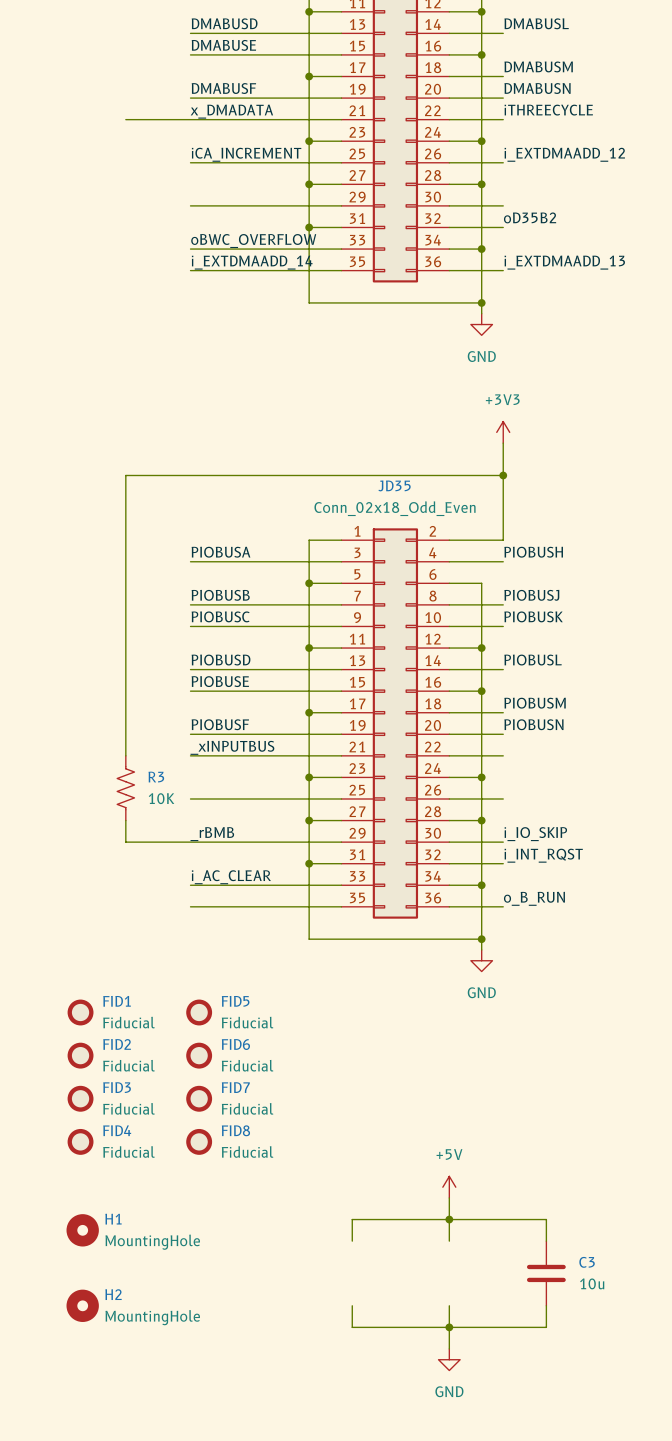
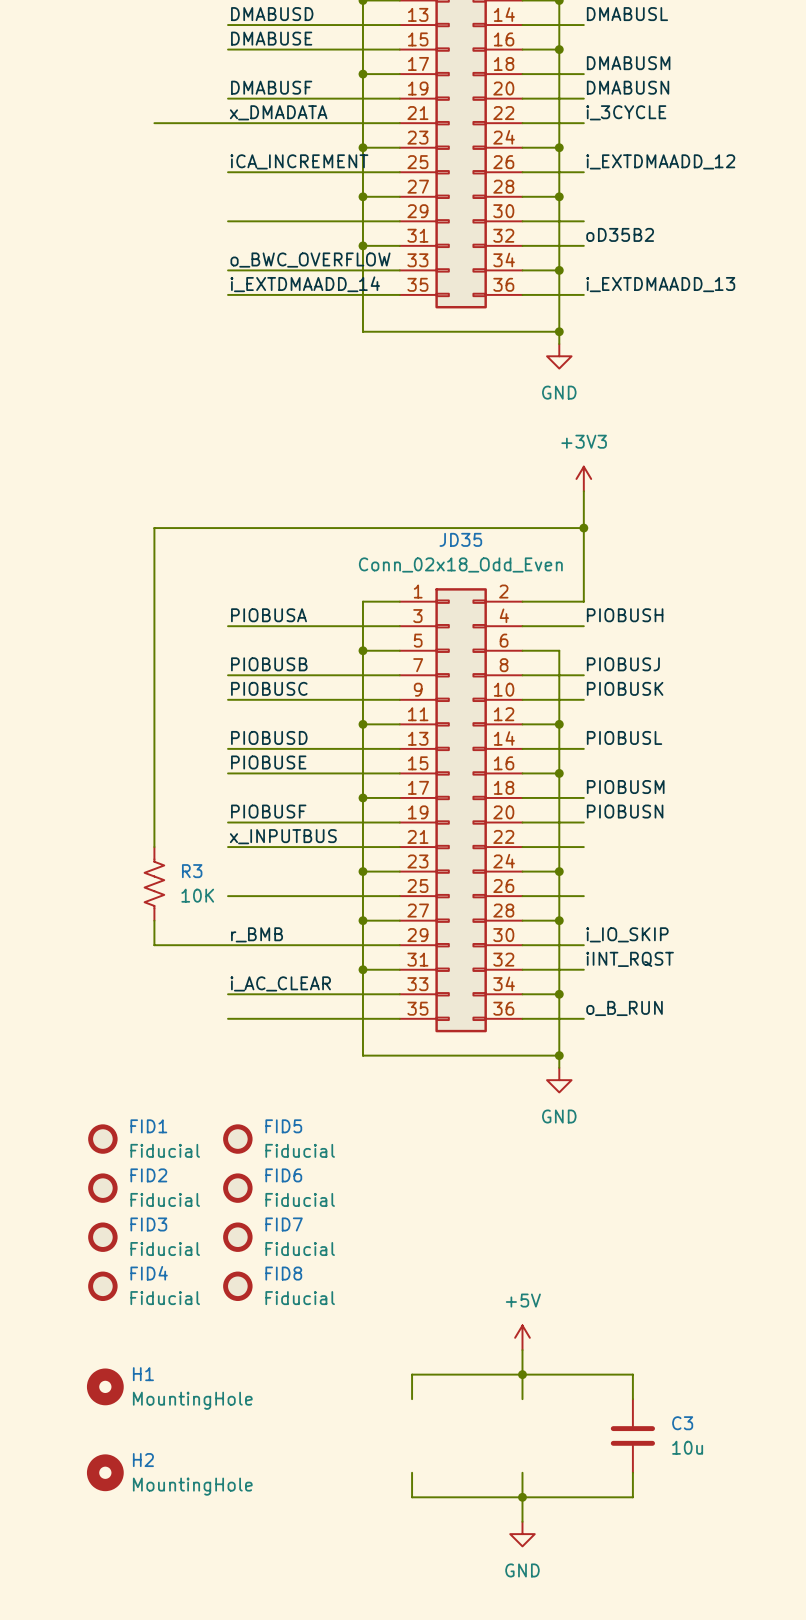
label: iTHREECYCLE (548, 110) -> i_3CYCLE (626, 112)
label: oBWC_OVERFLOW (253, 241) -> o_BWC_OVERFLOW (310, 260)
label: _xINPUTBUS (232, 747) -> x_INPUTBUS (283, 836)
label: _rBMB (212, 834) -> r_BMB (257, 934)
label: i_INT_RQST (543, 855) -> iINT_RQST (630, 959)

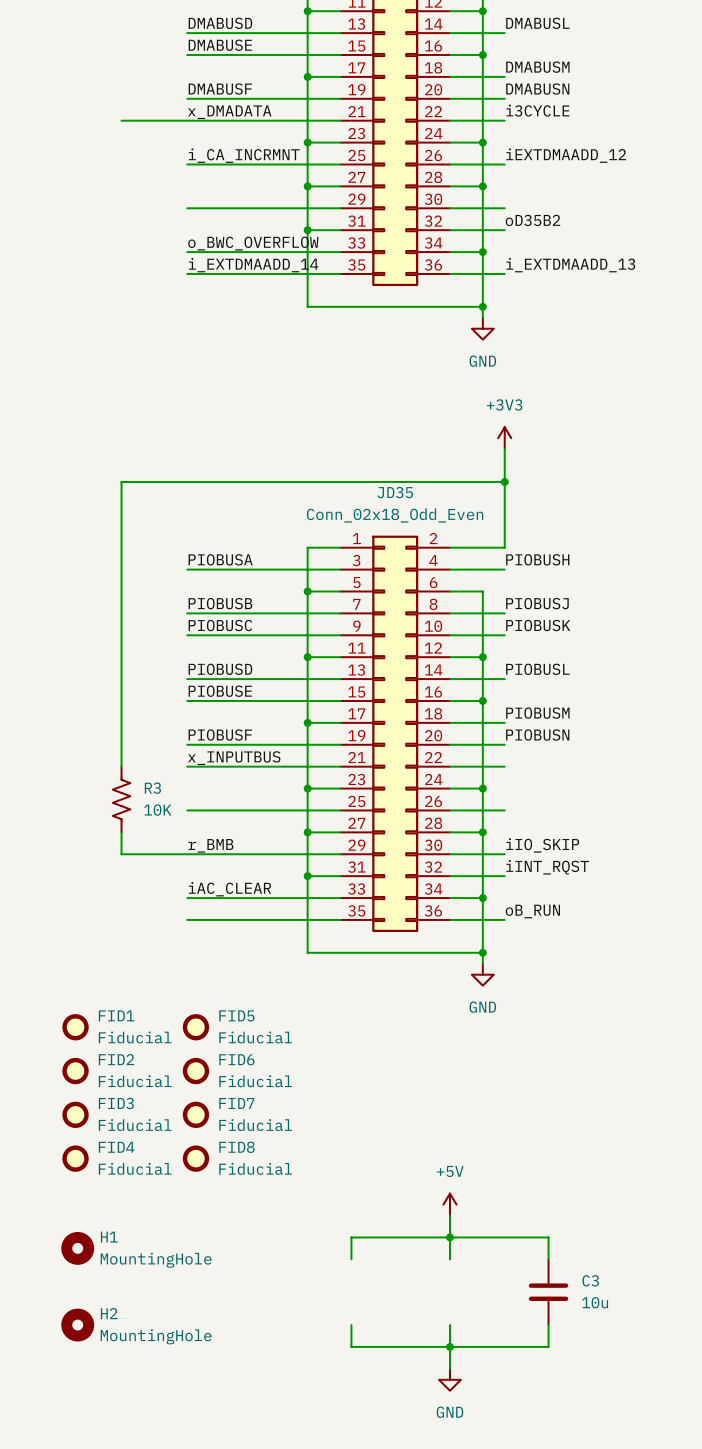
label: i_3CYCLE (626, 112) -> i3CYCLE (537, 110)
label: iCA_INCREMENT (299, 161) -> i_CA_INCRMNT (244, 155)
label: i_EXTDMAADD_12 (660, 161) -> iEXTDMAADD_12 (566, 155)
label: i_IO_SKIP (627, 934) -> iIO_SKIP (542, 845)
label: i_AC_CLEAR (280, 983) -> iAC_CLEAR (230, 889)
label: o_B_RUN (624, 1008) -> oB_RUN (532, 911)

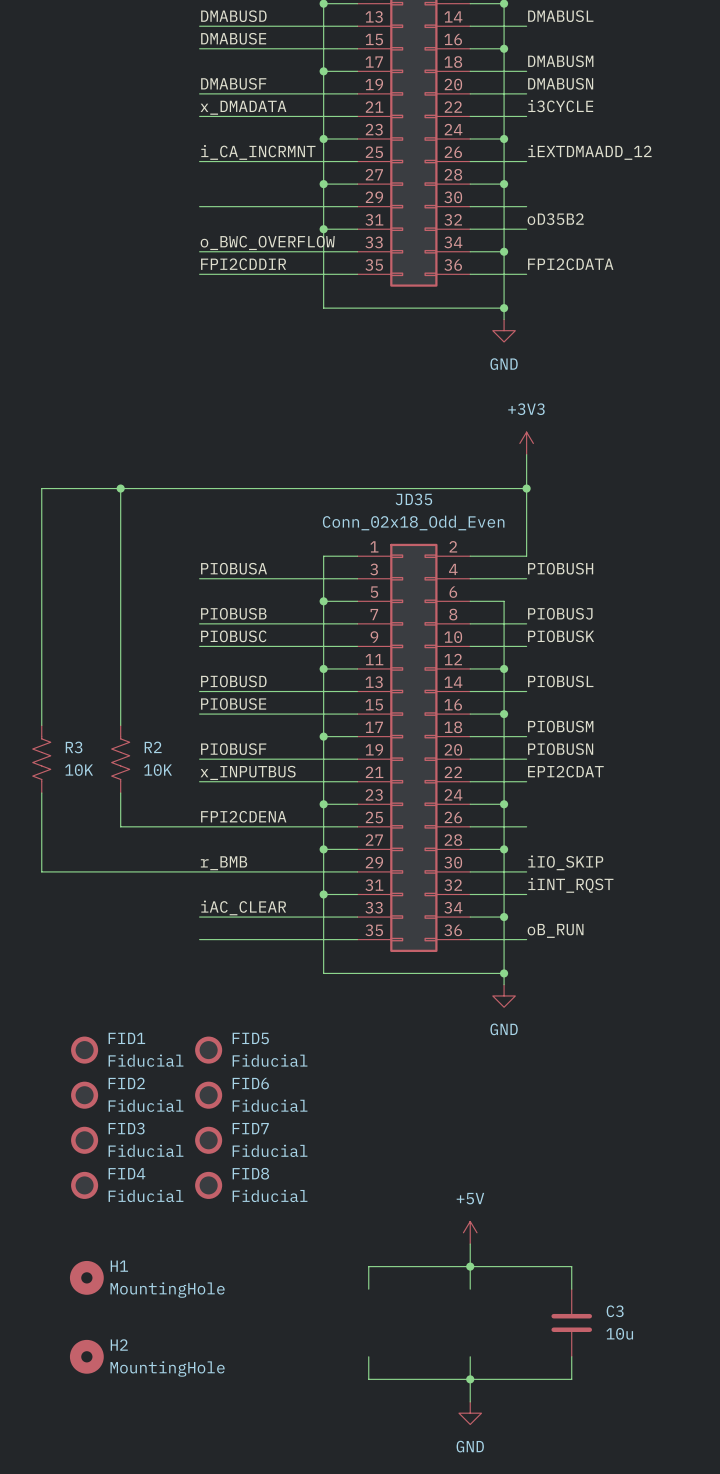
wire: (121, 120) (187, 120) -> none
label: i_EXTDMAADD_14 (253, 265) -> FPI2CDDIR (243, 264)
label: i_EXTDMAADD_13 (570, 265) -> FPI2CDATA (570, 264)
wire: none -> (120, 488) (120, 725)
junction: none -> (120, 488)
wire: (121, 482) (121, 766) -> (131, 488) (41, 488) (41, 725)
R2: none -> 10K (120, 759)
label: none -> EPI2CDAT (565, 771)
wire: none -> (120, 793) (120, 826) (199, 826)
R3 position: (121, 799) -> (41, 759)
label: none -> FPI2CDENA (243, 816)
wire: (121, 832) (121, 854) -> (41, 793) (41, 871) (131, 871)

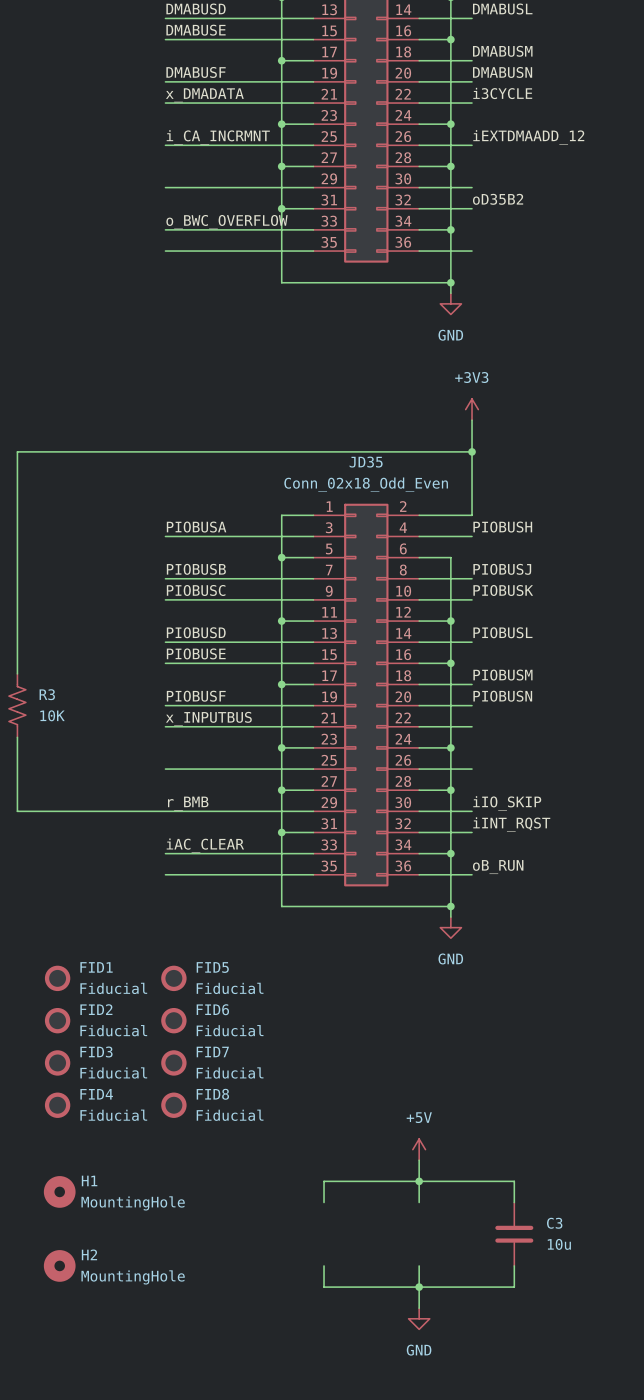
label: FPI2CDDIR (243, 264) -> none
label: FPI2CDATA (570, 264) -> none
wire: (120, 488) (120, 725) -> none
junction: (120, 488) -> none
R2: 10K (120, 759) -> none
label: EPI2CDAT (565, 771) -> none
wire: (120, 793) (120, 826) (199, 826) -> none
label: FPI2CDENA (243, 816) -> none

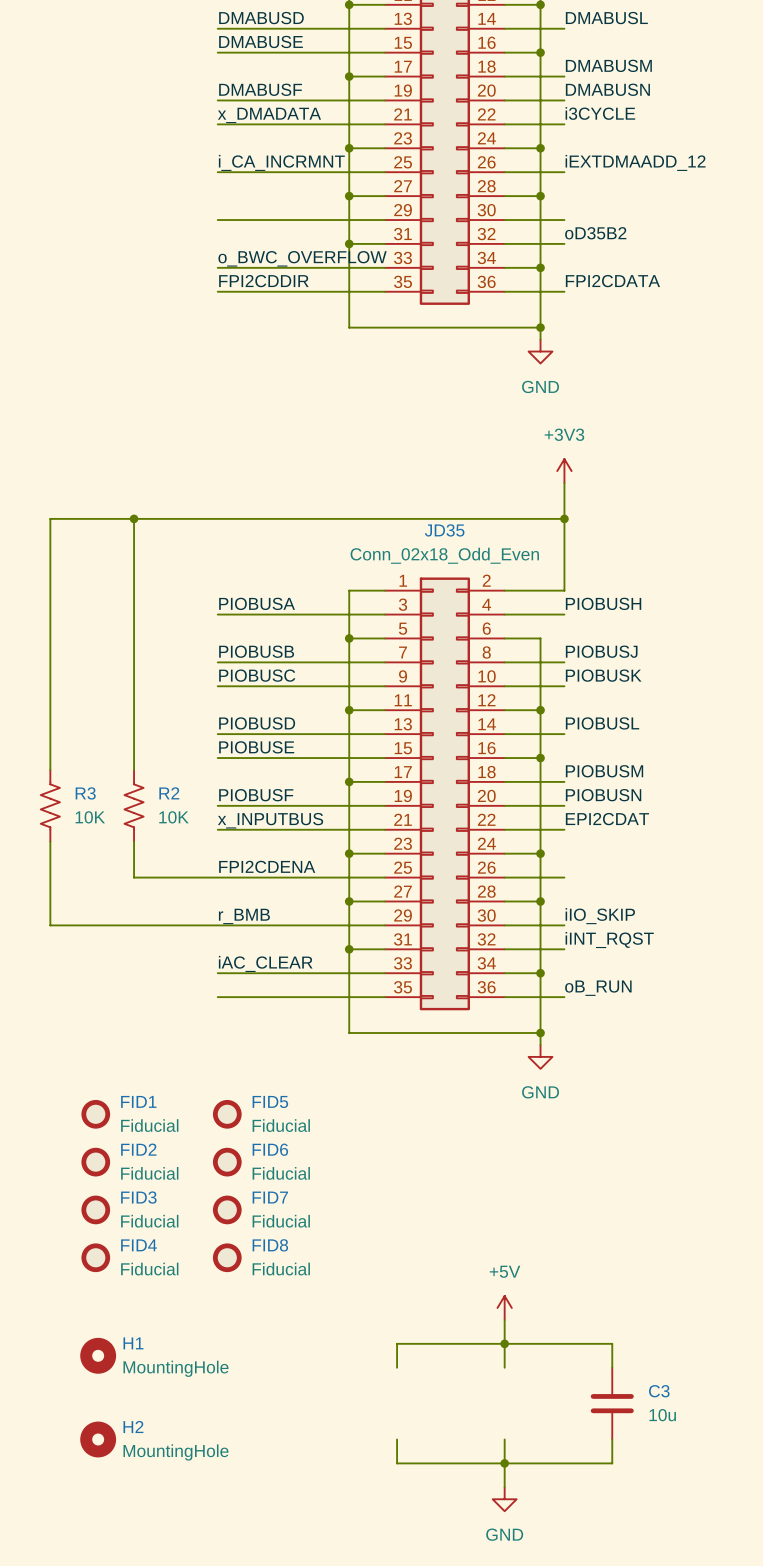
label: none -> FPI2CDDIR (263, 281)
label: none -> FPI2CDATA (612, 281)
wire: none -> (134, 518) (134, 769)
junction: none -> (134, 518)
R2: none -> 10K (134, 805)
label: none -> EPI2CDAT (607, 819)
wire: none -> (134, 841) (134, 877) (217, 877)
label: none -> FPI2CDENA (267, 866)

